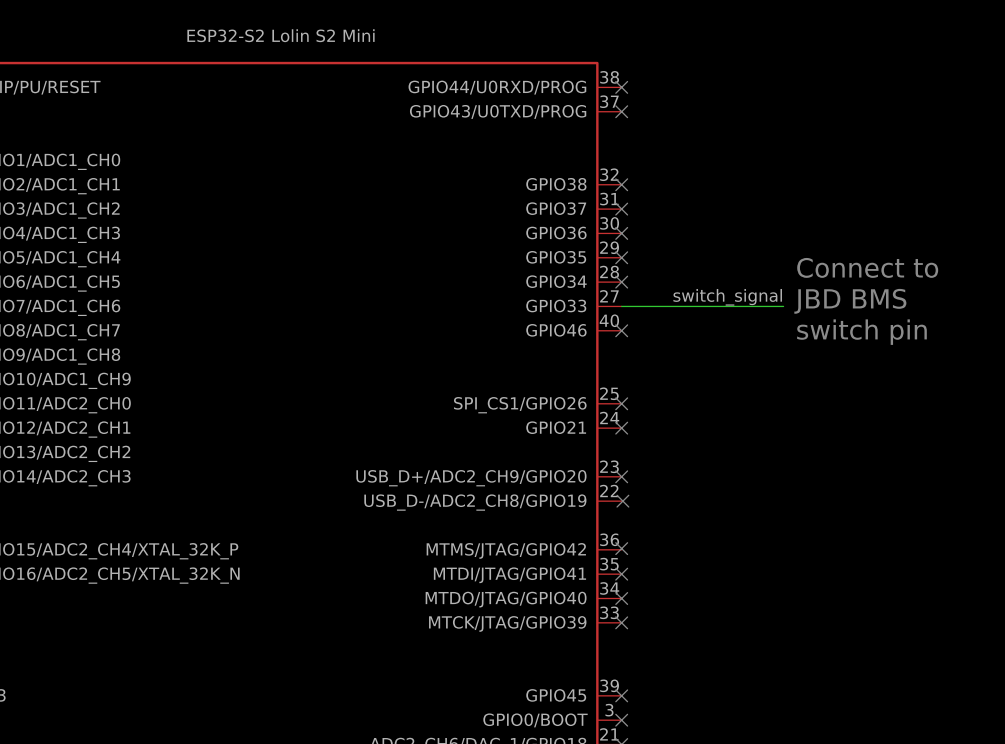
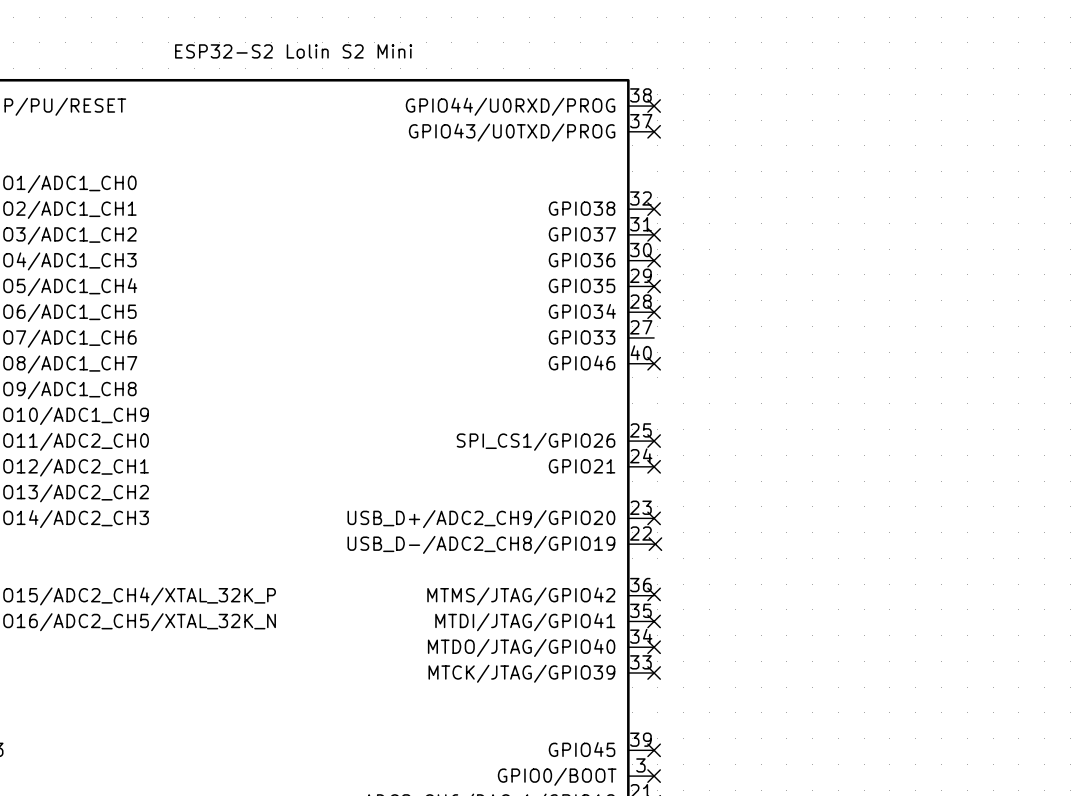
text: Connect to (867, 267) -> none
label: switch_signal (727, 297) -> none
text: JBD BMS (850, 301) -> none
wire: (621, 306) (783, 306) -> none
text: switch pin (861, 332) -> none

